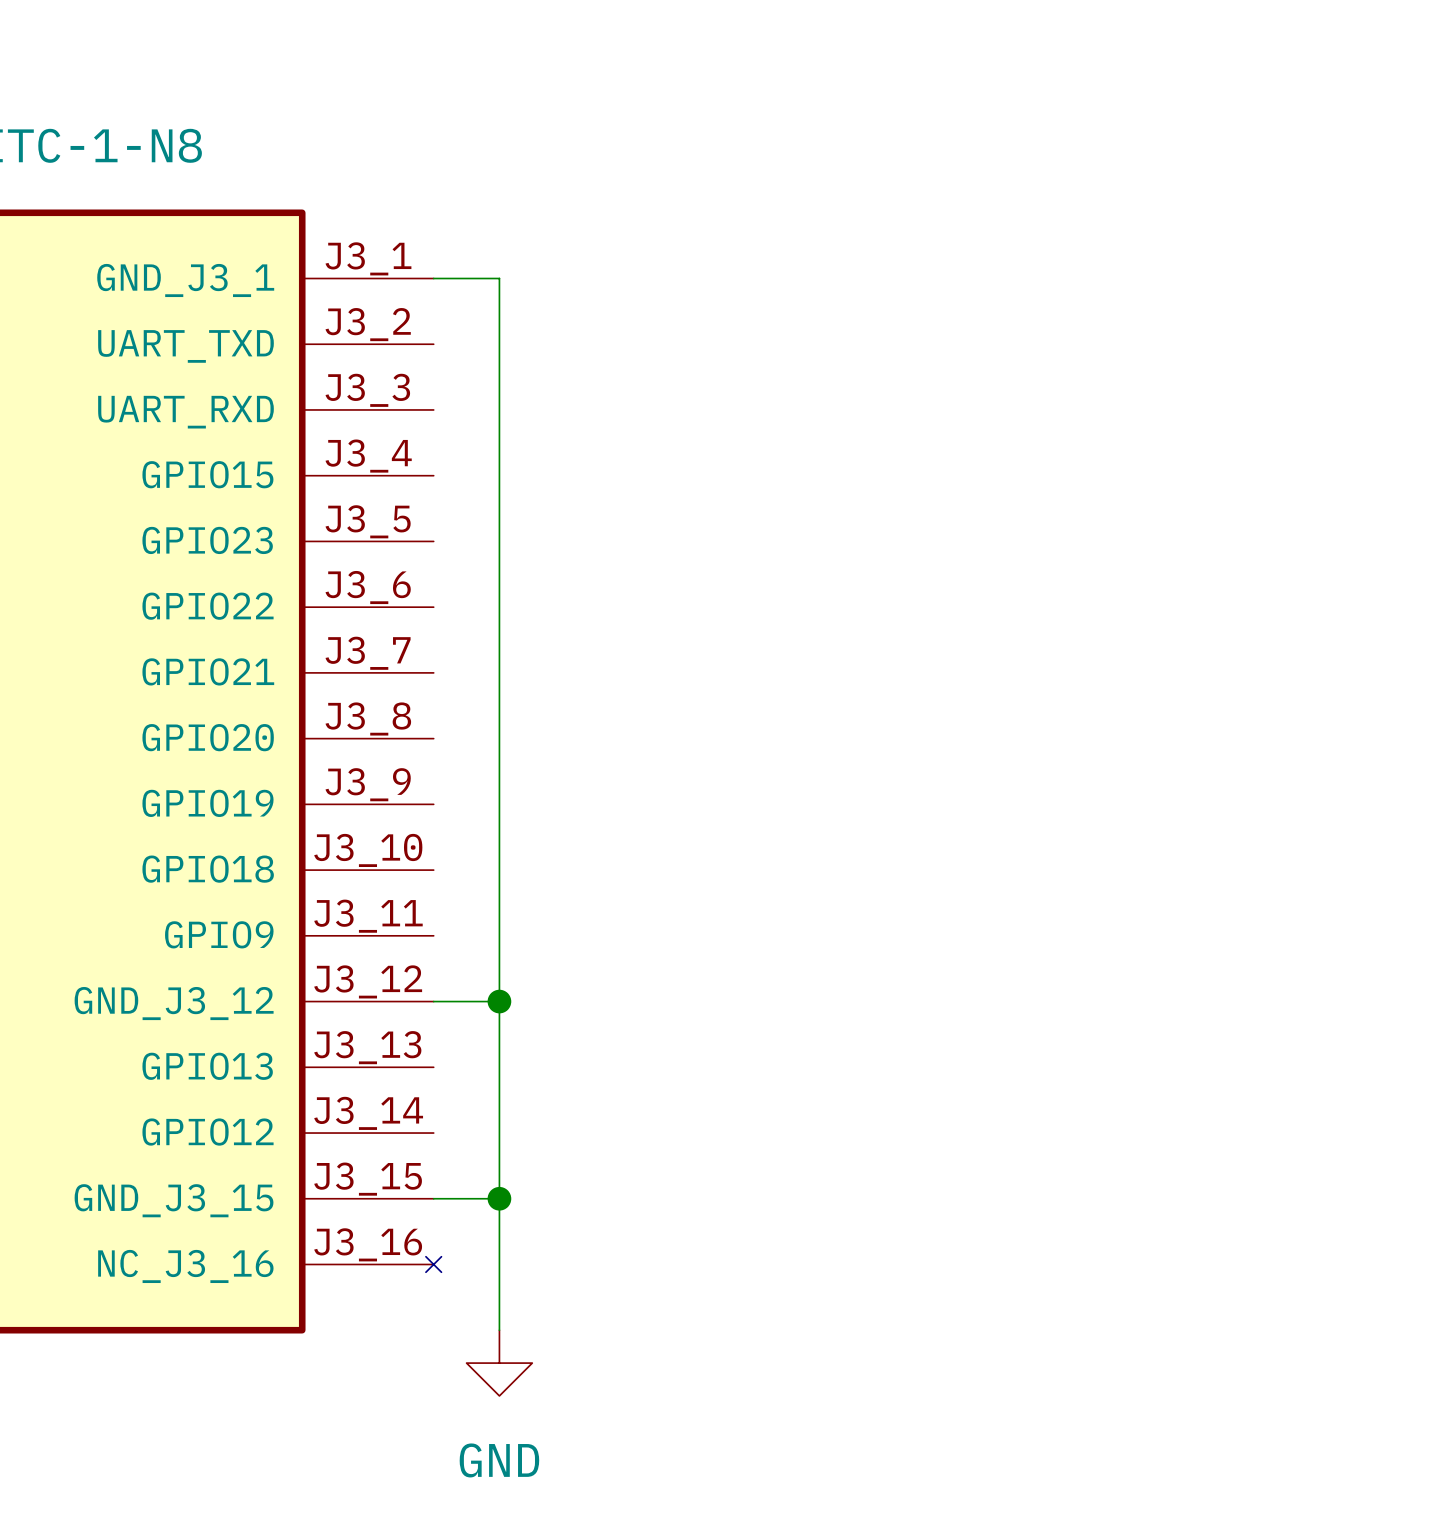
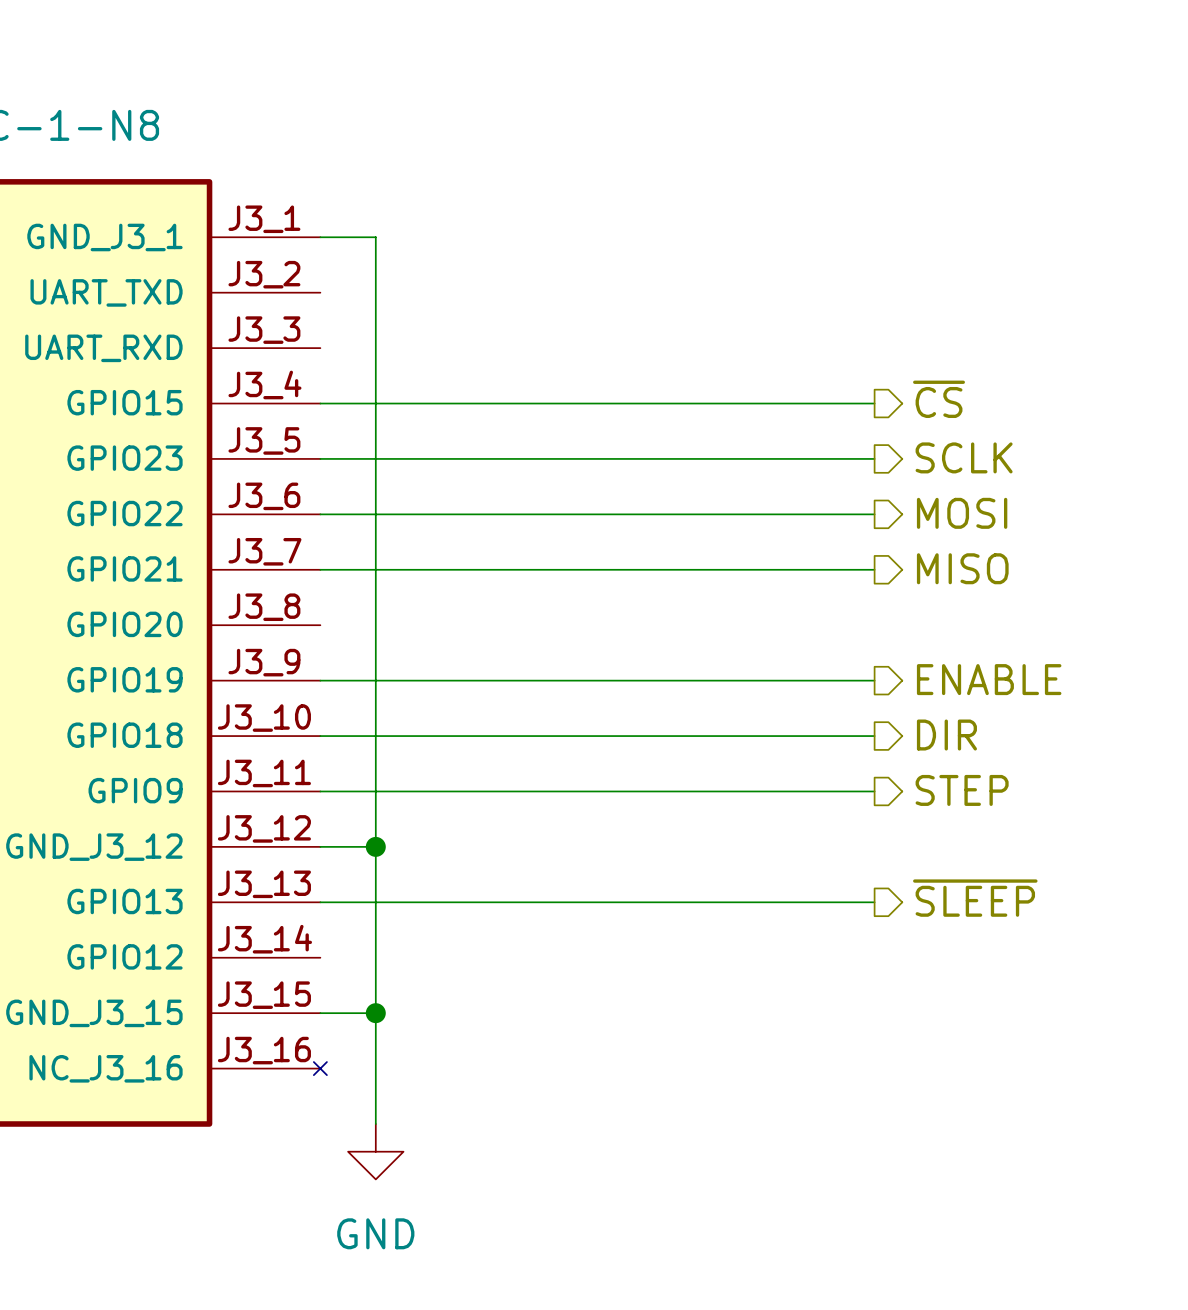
hierarchical label: none -> ~{CS} (939, 399)
wire: none -> (320, 403) (874, 403)
hierarchical label: none -> SCLK (964, 457)
wire: none -> (320, 458) (874, 458)
hierarchical label: none -> MOSI (962, 513)
wire: none -> (320, 514) (874, 514)
hierarchical label: none -> MISO (962, 568)
wire: none -> (320, 569) (874, 569)
hierarchical label: none -> ENABLE (989, 679)
wire: none -> (320, 680) (874, 680)
hierarchical label: none -> DIR (946, 735)
wire: none -> (320, 736) (874, 736)
hierarchical label: none -> STEP (962, 790)
wire: none -> (320, 791) (874, 791)
hierarchical label: none -> ~{SLEEP} (975, 898)
wire: none -> (320, 902) (874, 902)

